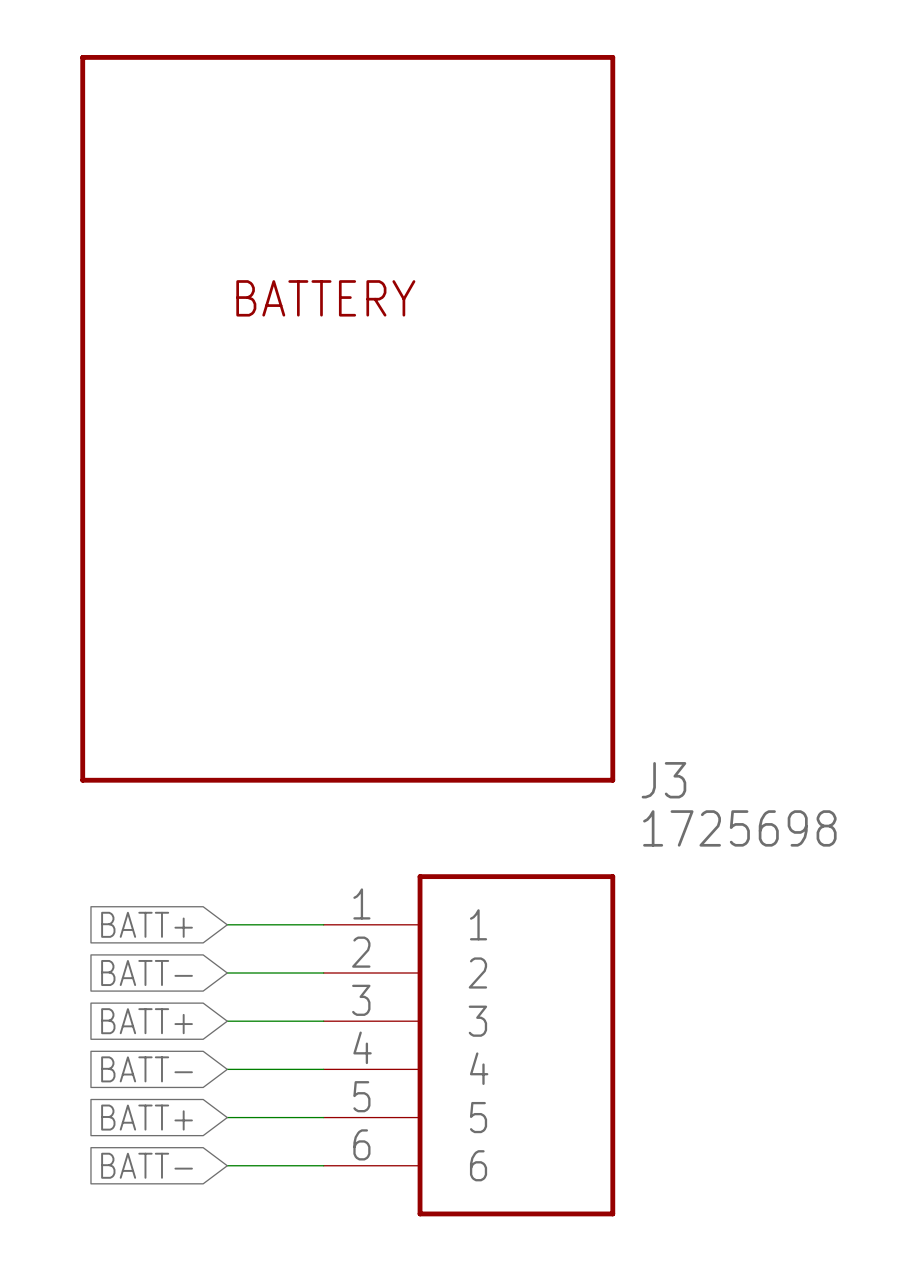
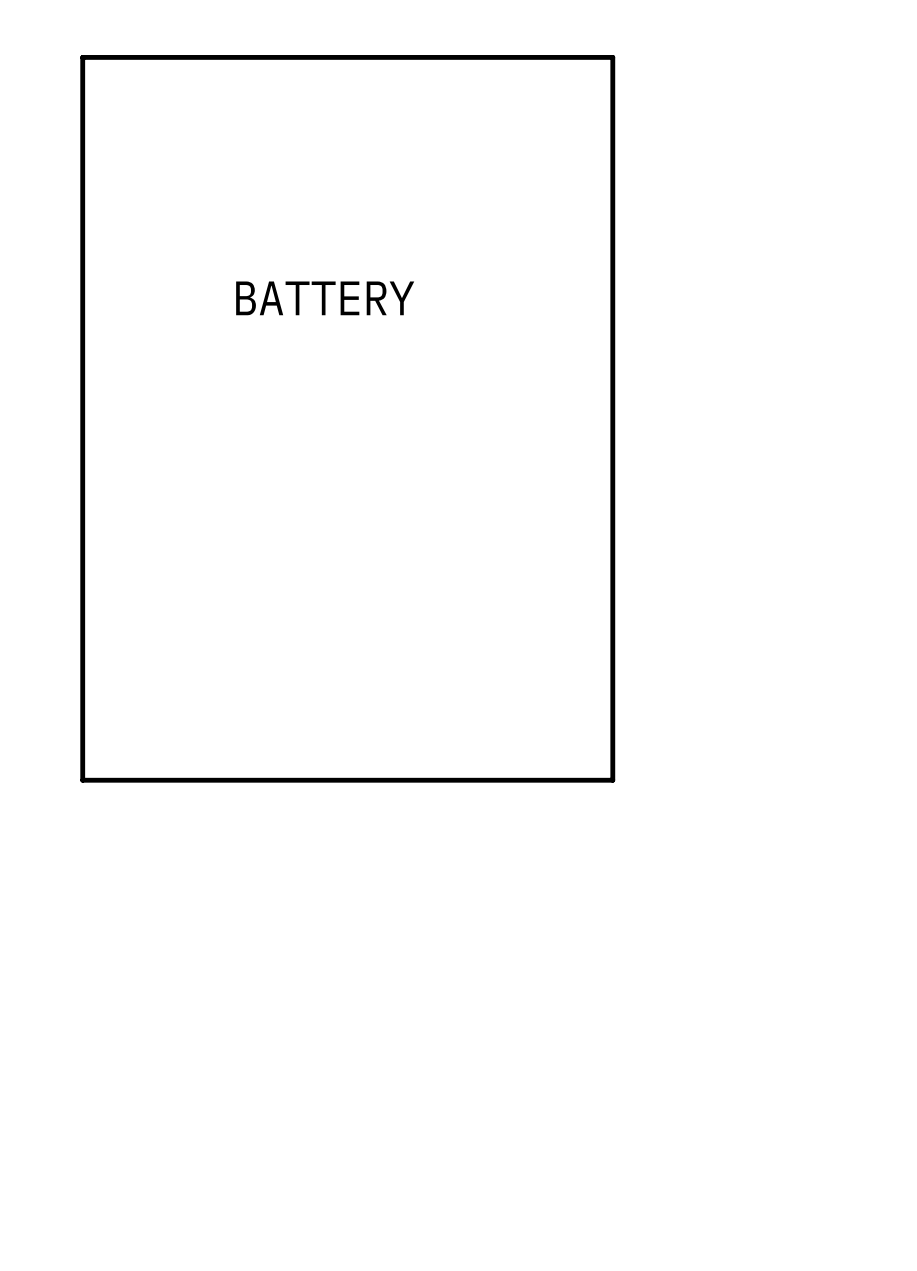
global label: BATT+ (147, 924) -> none
wire: (227, 924) (323, 924) -> none
global label: BATT- (147, 973) -> none
wire: (227, 973) (323, 973) -> none
global label: BATT+ (147, 1021) -> none
wire: (227, 1021) (323, 1021) -> none
J3: 1725698 (469, 1045) -> none
global label: BATT- (147, 1069) -> none
wire: (227, 1069) (323, 1069) -> none
global label: BATT+ (147, 1117) -> none
wire: (227, 1117) (323, 1117) -> none
global label: BATT- (147, 1165) -> none
wire: (227, 1165) (323, 1165) -> none

